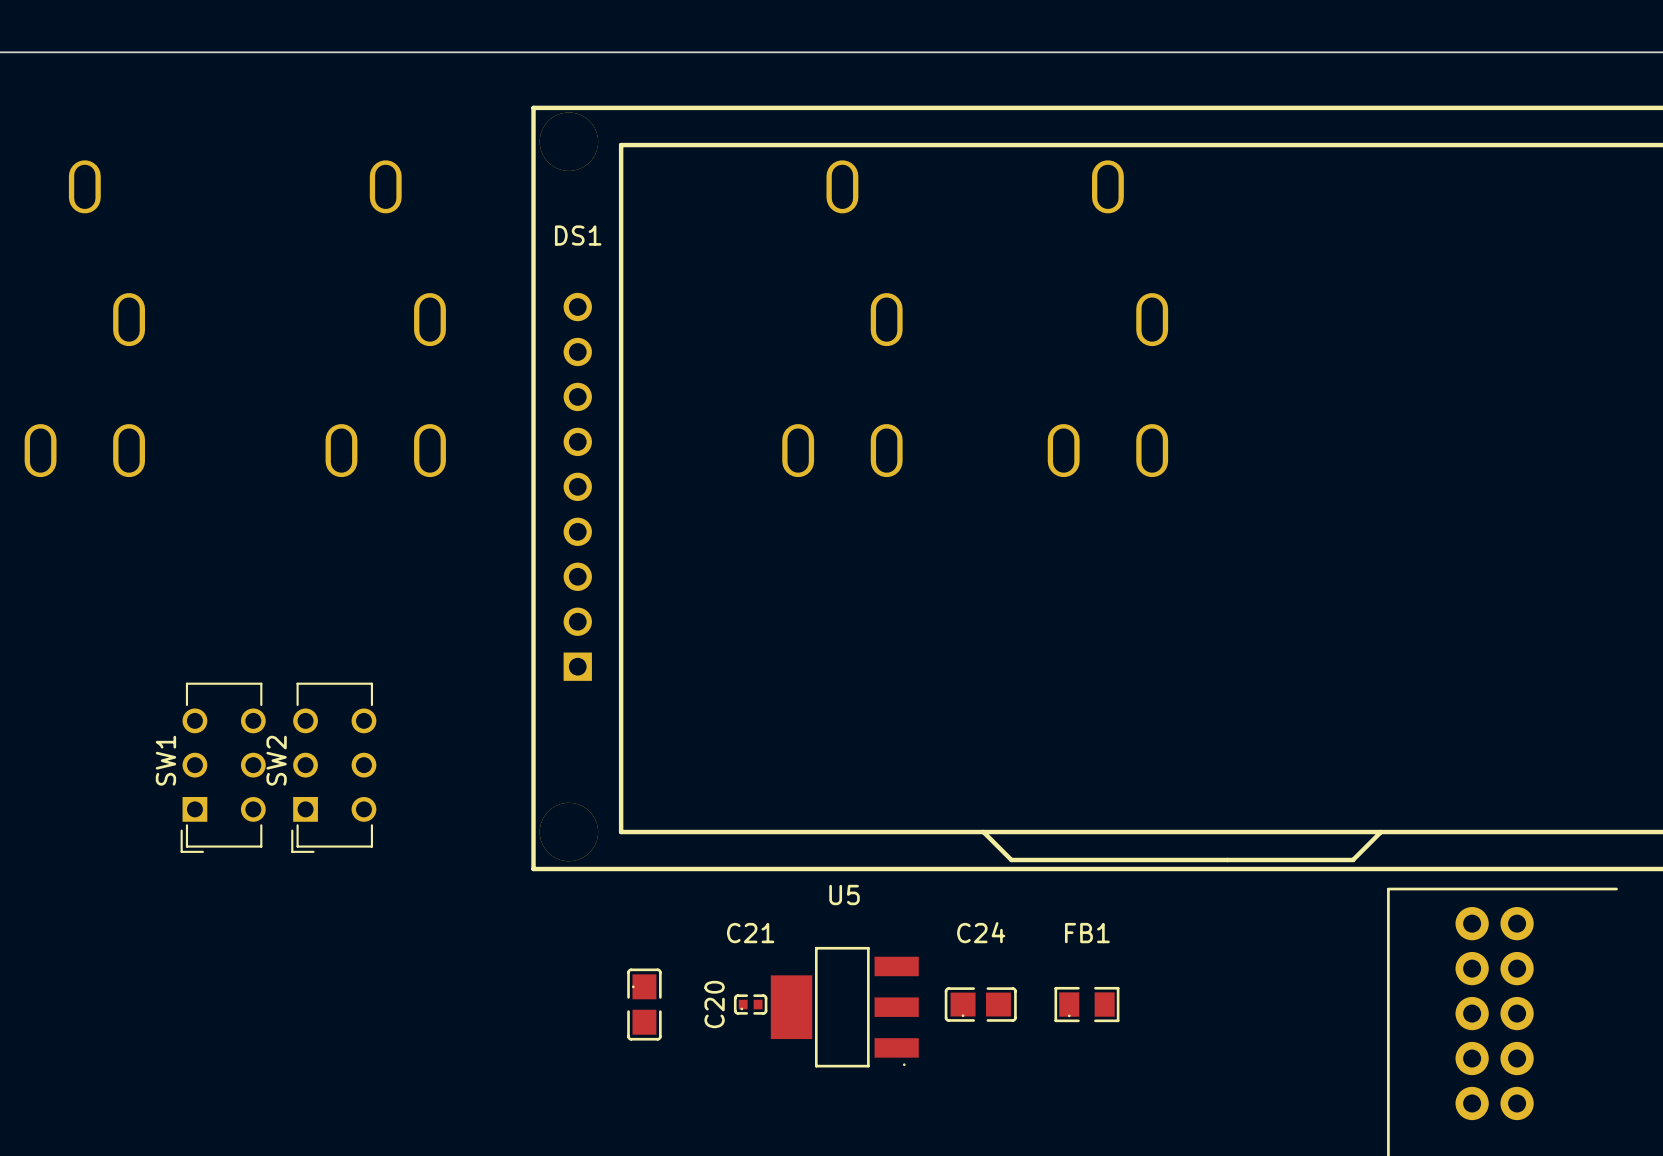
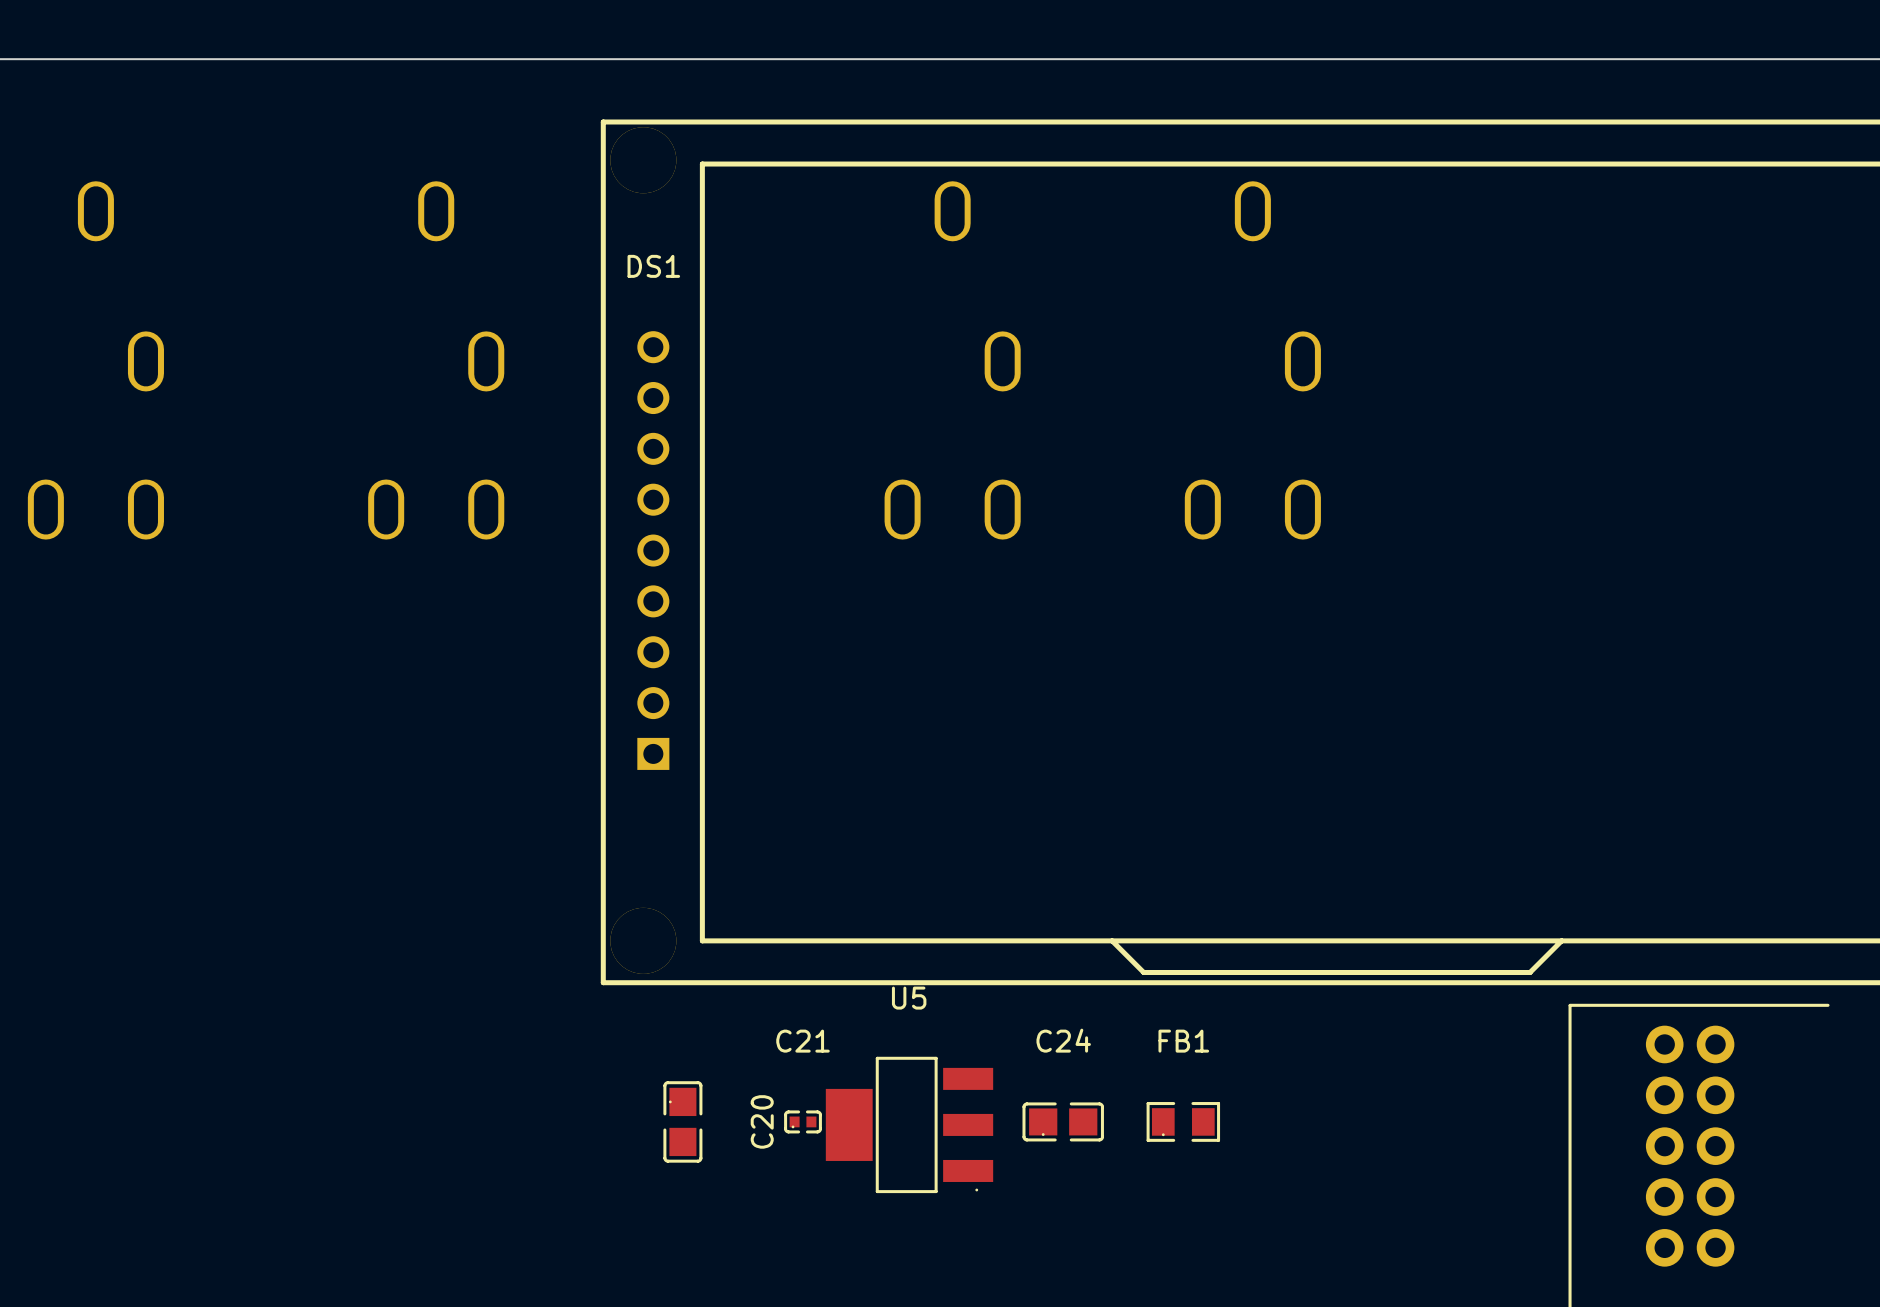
SW1: (223, 767) -> none
SW2: (333, 767) -> none
C20 position: (644, 1004) -> (682, 1121)
C21 position: (750, 1004) -> (803, 1121)
C24 position: (980, 1004) -> (1063, 1121)
FB1 position: (1086, 1004) -> (1183, 1121)
U5 position: (844, 1007) -> (909, 1124)

